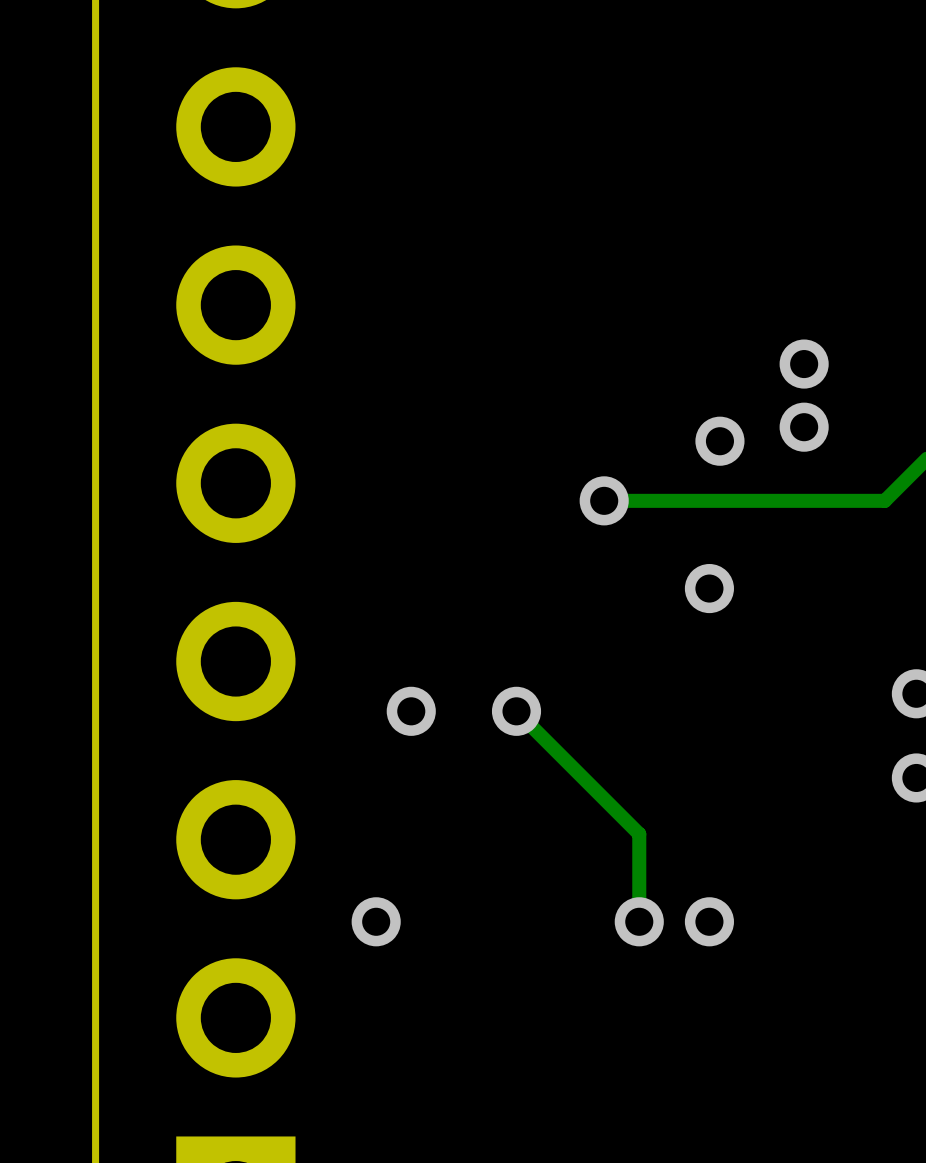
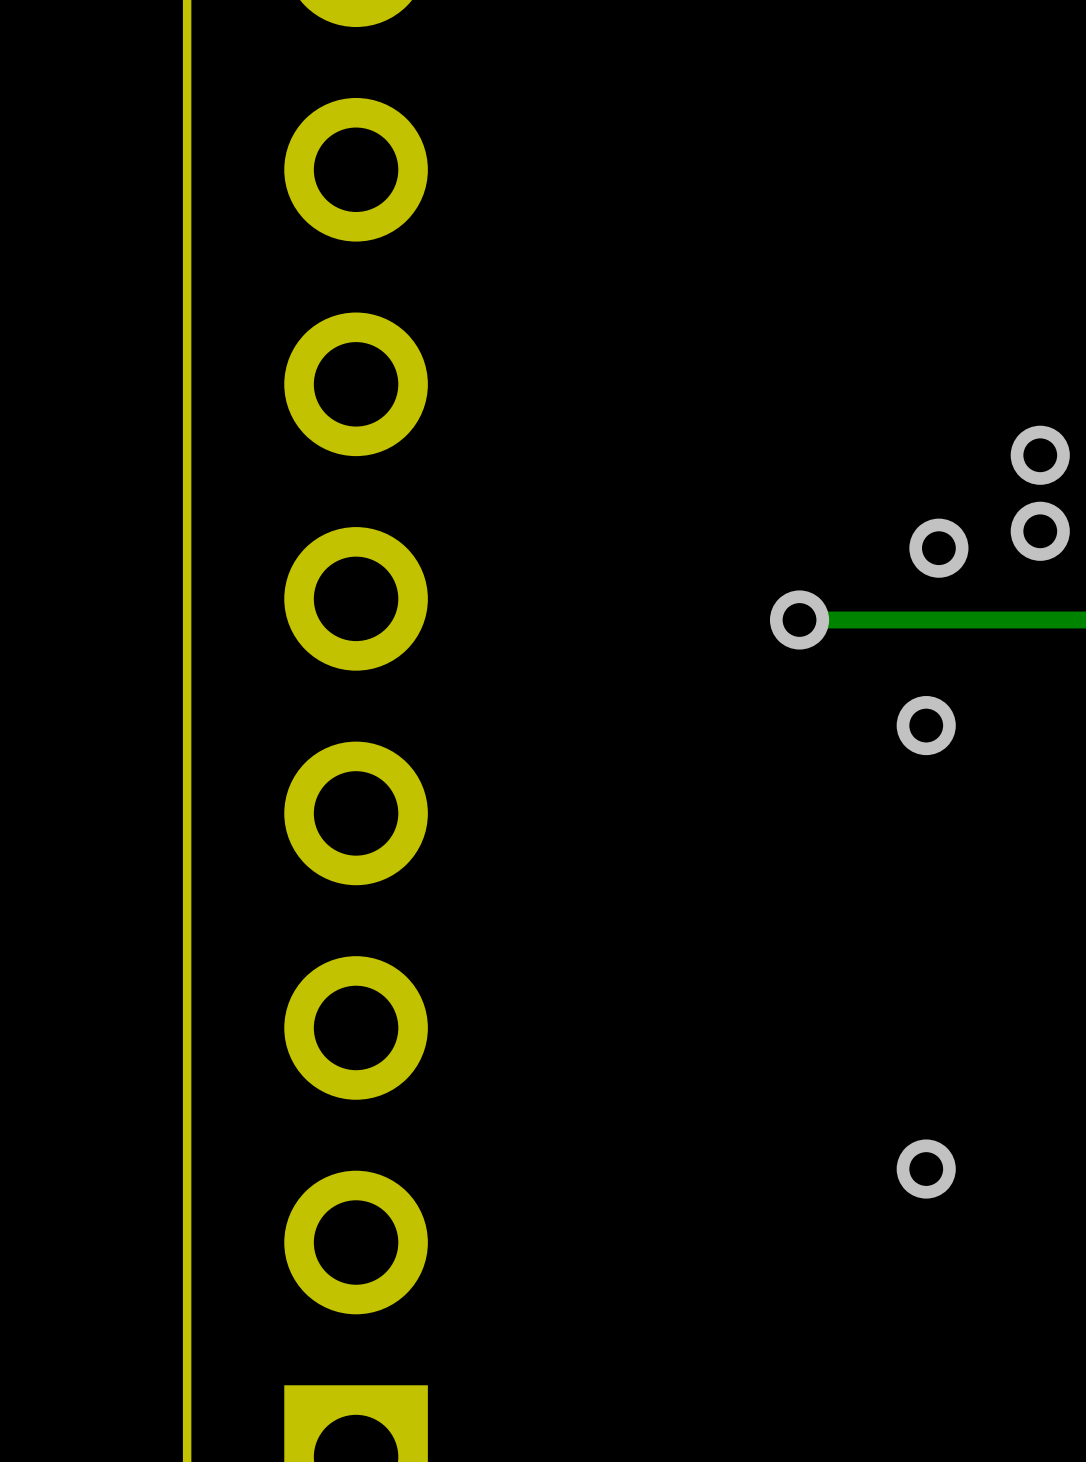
via: (411, 711) -> none
track: (516, 711) (639, 834) (639, 921) -> none
via: (516, 711) -> none
via: (376, 921) -> none
via: (639, 921) -> none
via position: (709, 921) -> (926, 1169)

